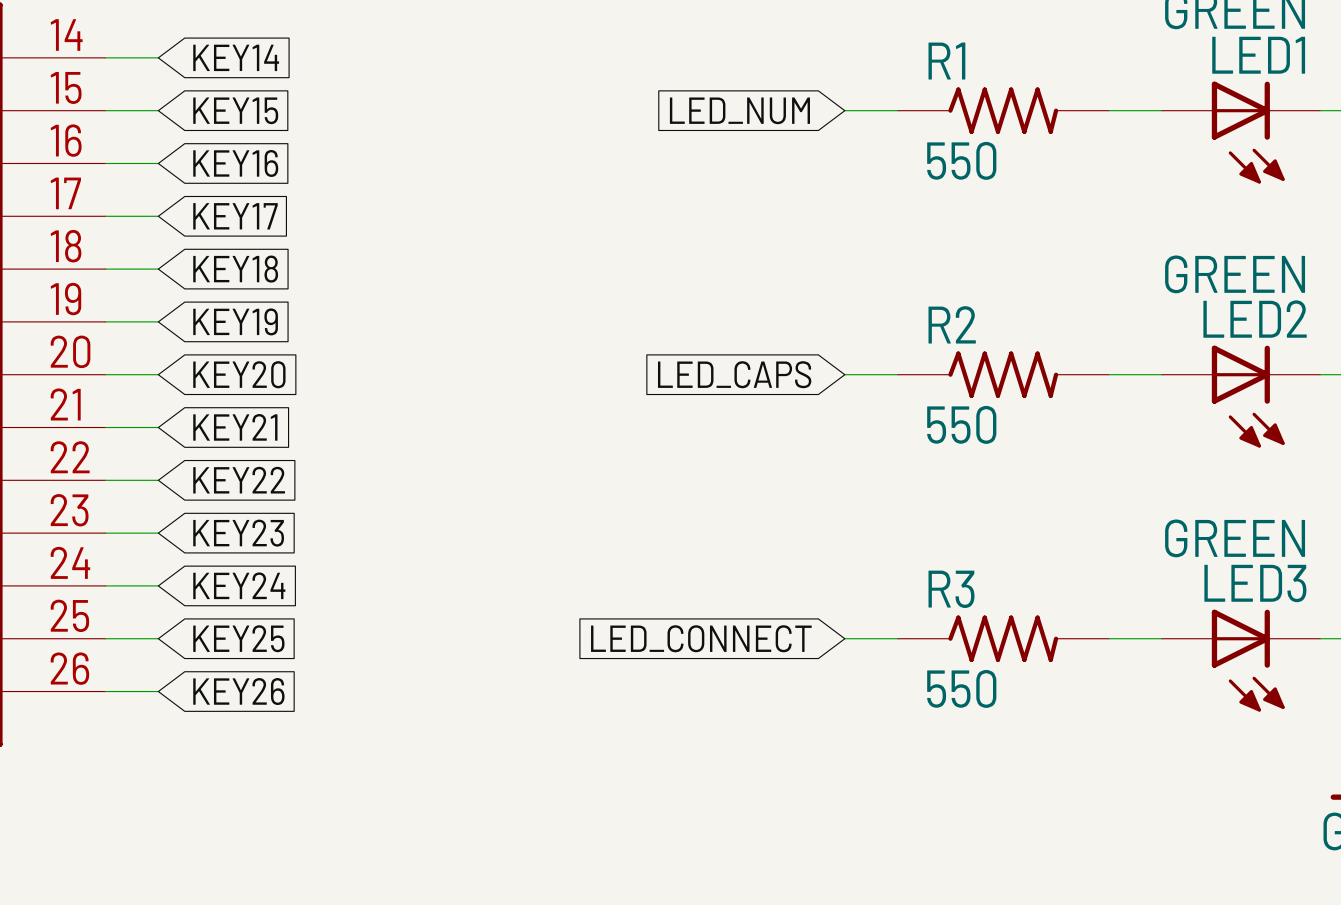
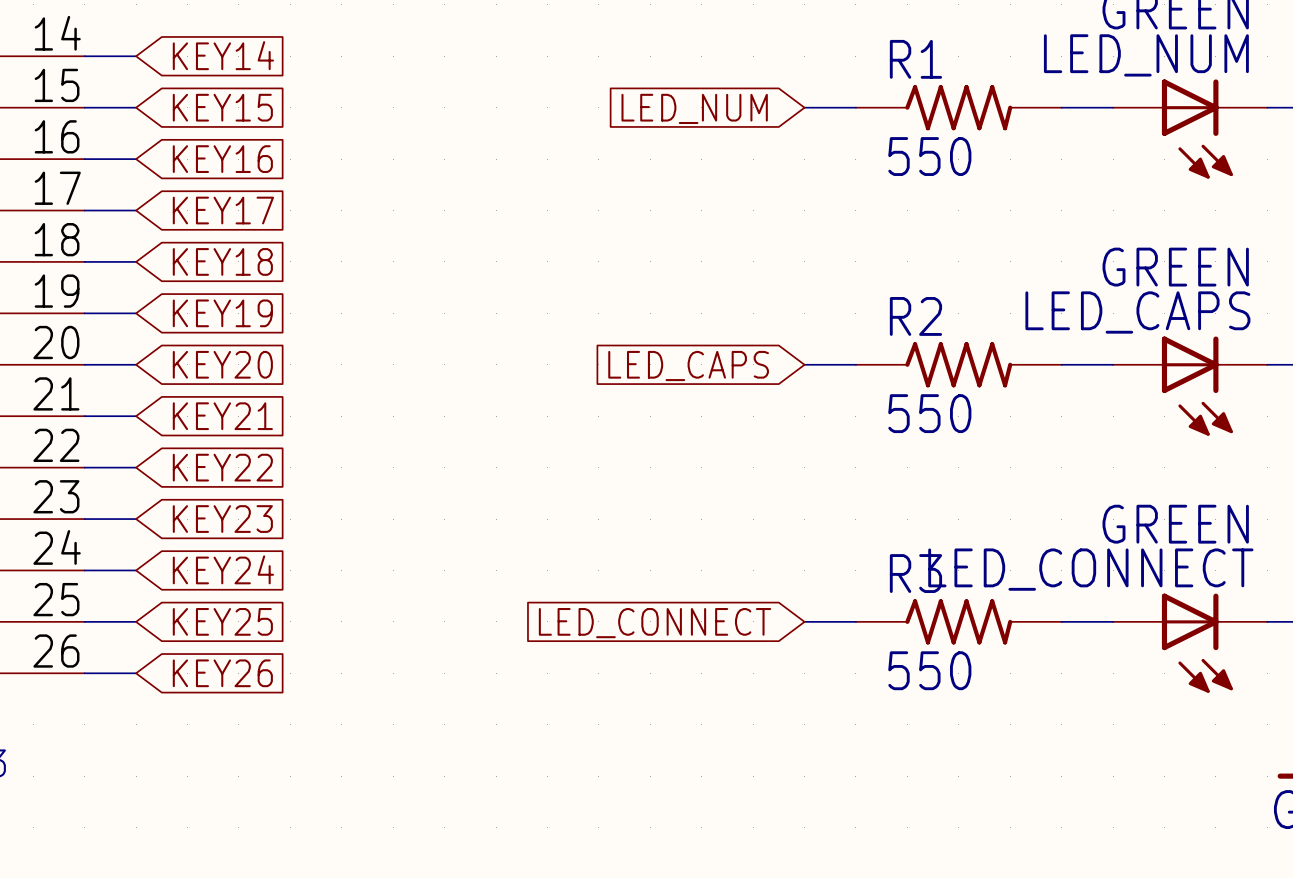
LED1 name: LED1 (1258, 55) -> LED_NUM (1146, 55)
LED2 name: LED2 (1255, 319) -> LED_CAPS (1137, 312)
LED3 name: LED3 (1255, 583) -> LED_CONNECT (1090, 569)

